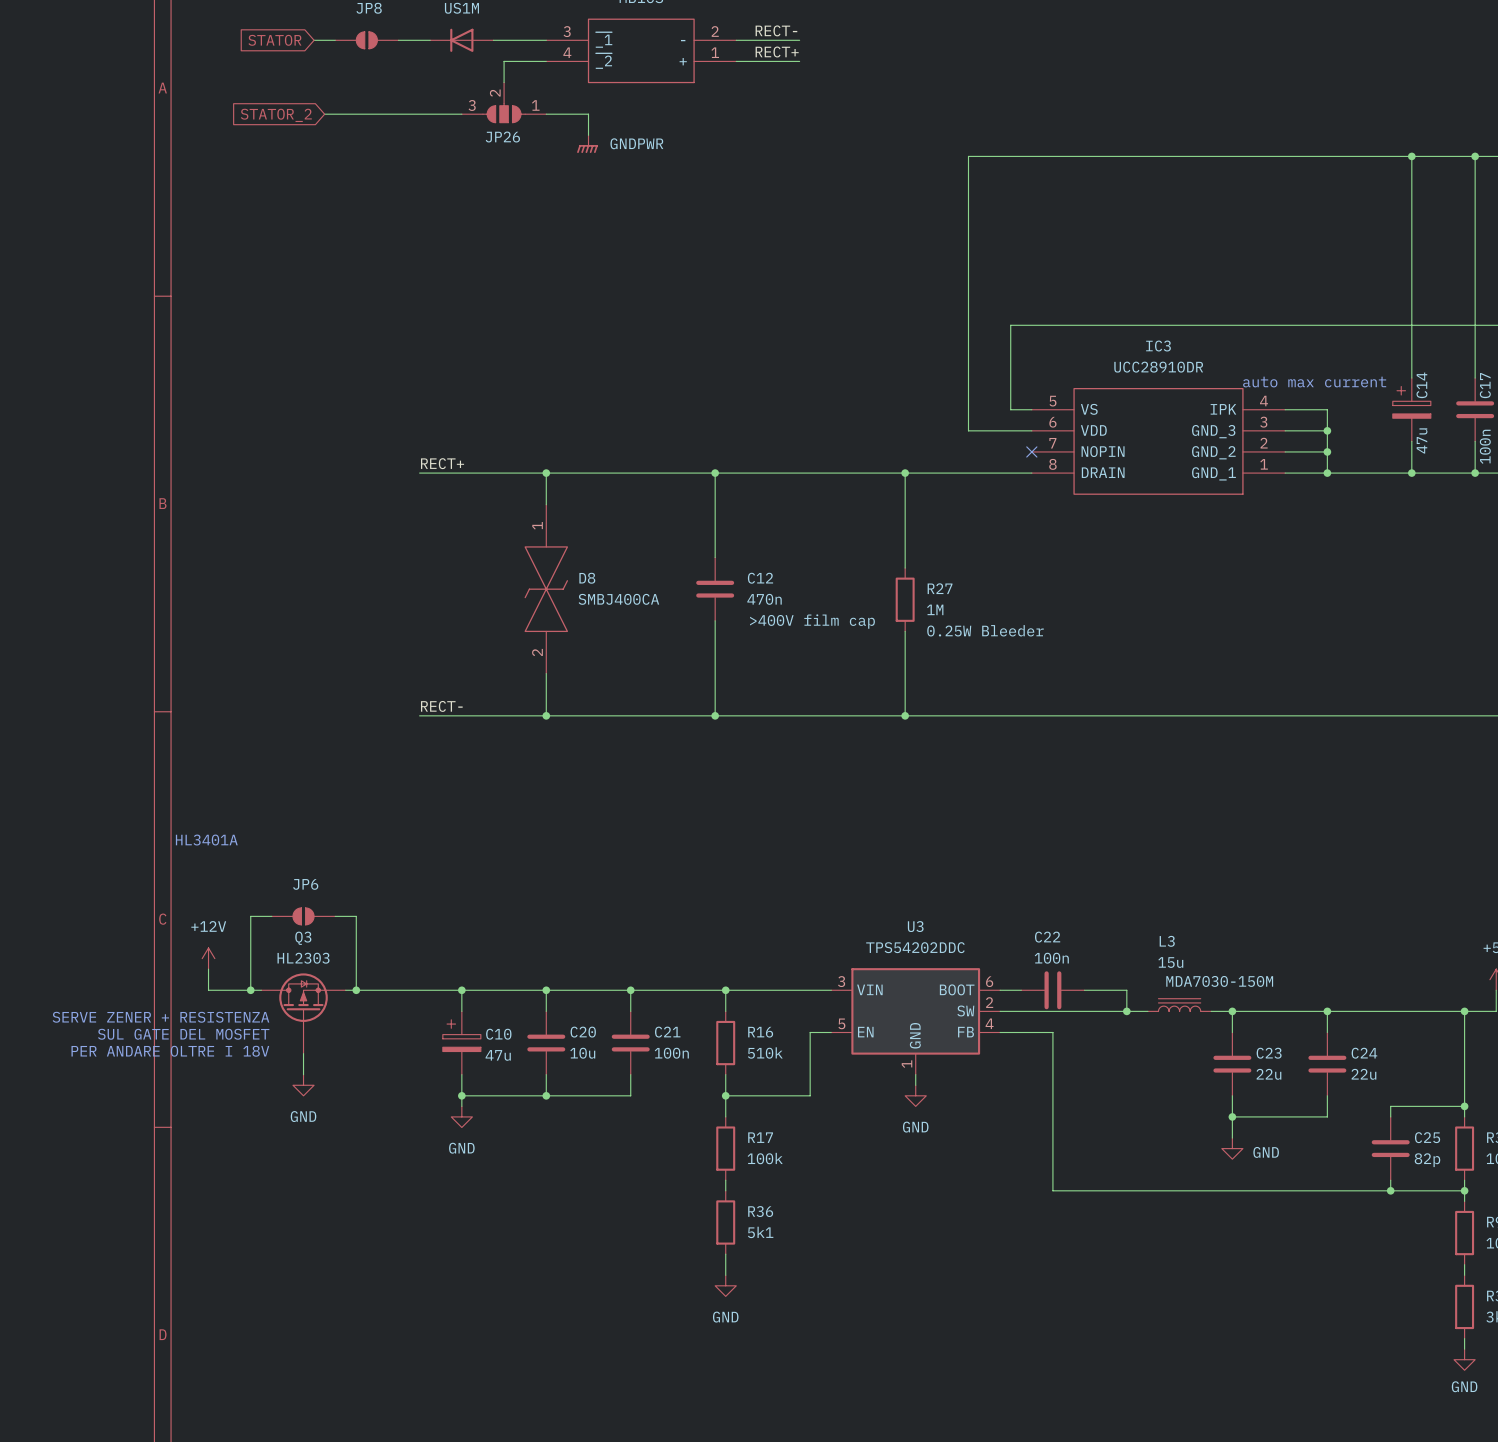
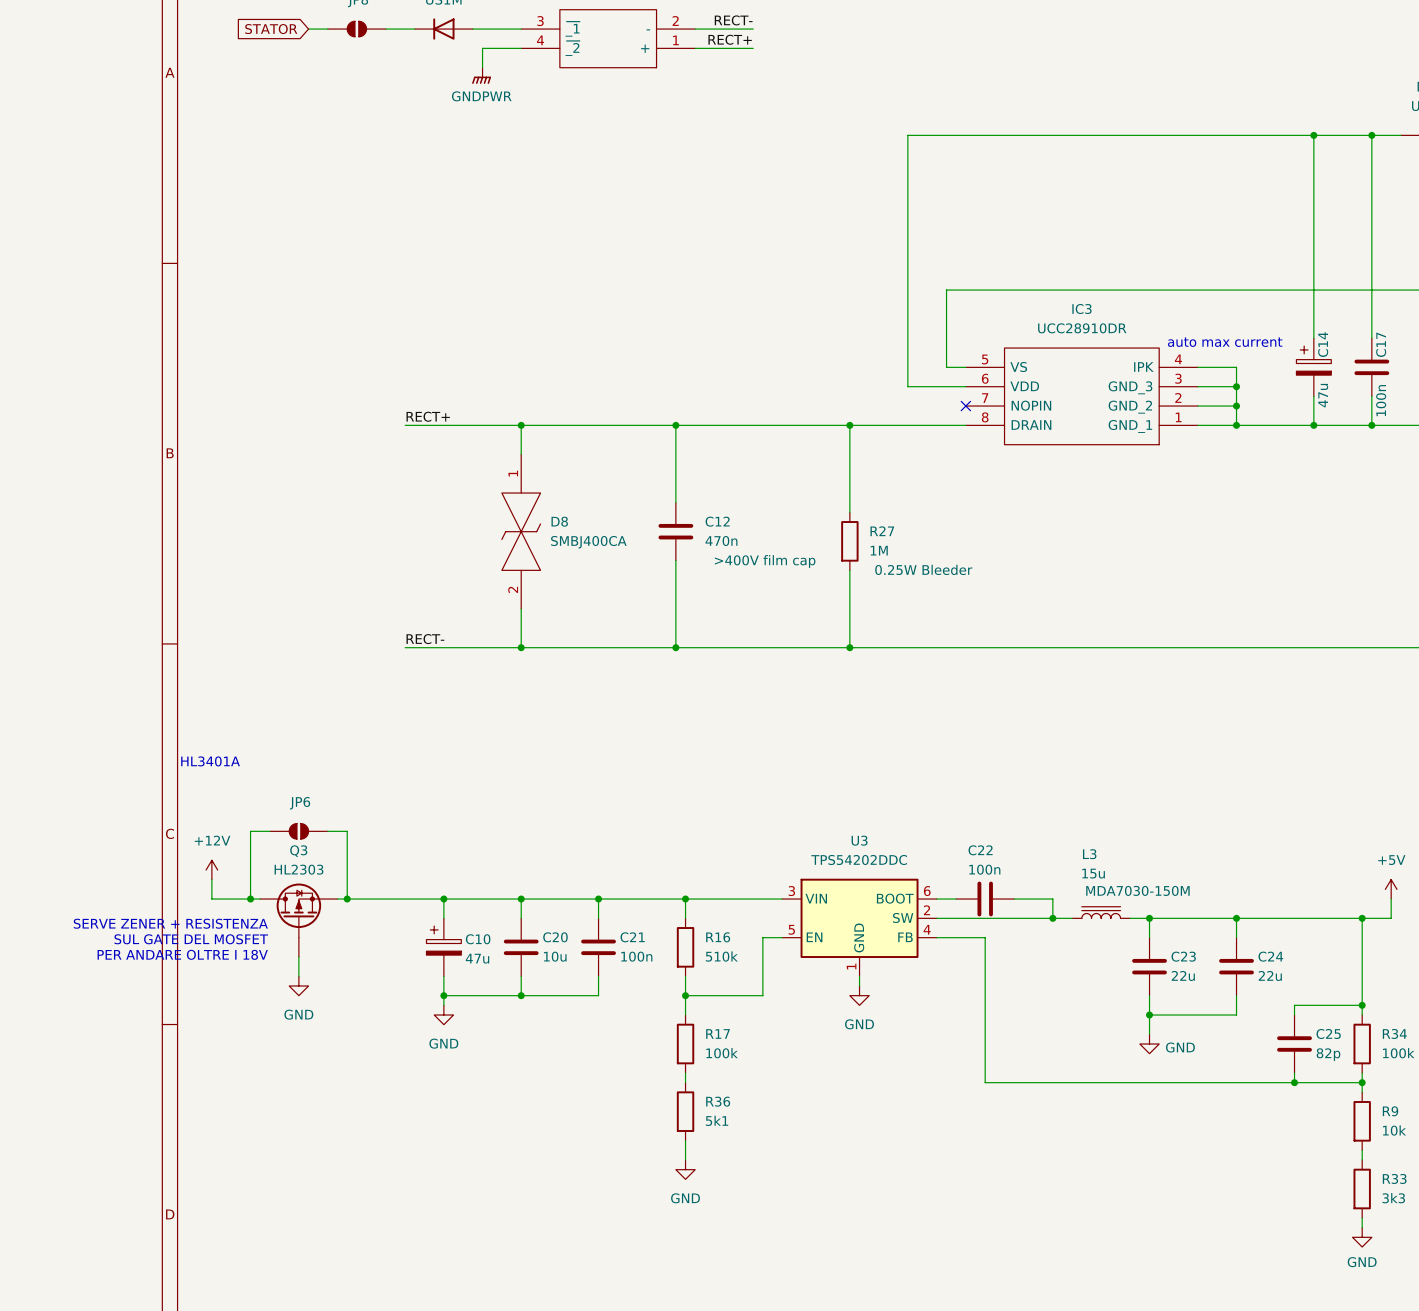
JP26: (504, 102) -> none
wire: (324, 114) (461, 114) -> none
wire: (546, 114) (588, 114) (588, 135) -> none
global label: STATOR_2 (276, 115) -> none
power symbol text position: GNDPWR (636, 143) -> GNDPWR (481, 96)
power symbol position: GNDPWR (587, 144) -> GNDPWR (481, 75)

